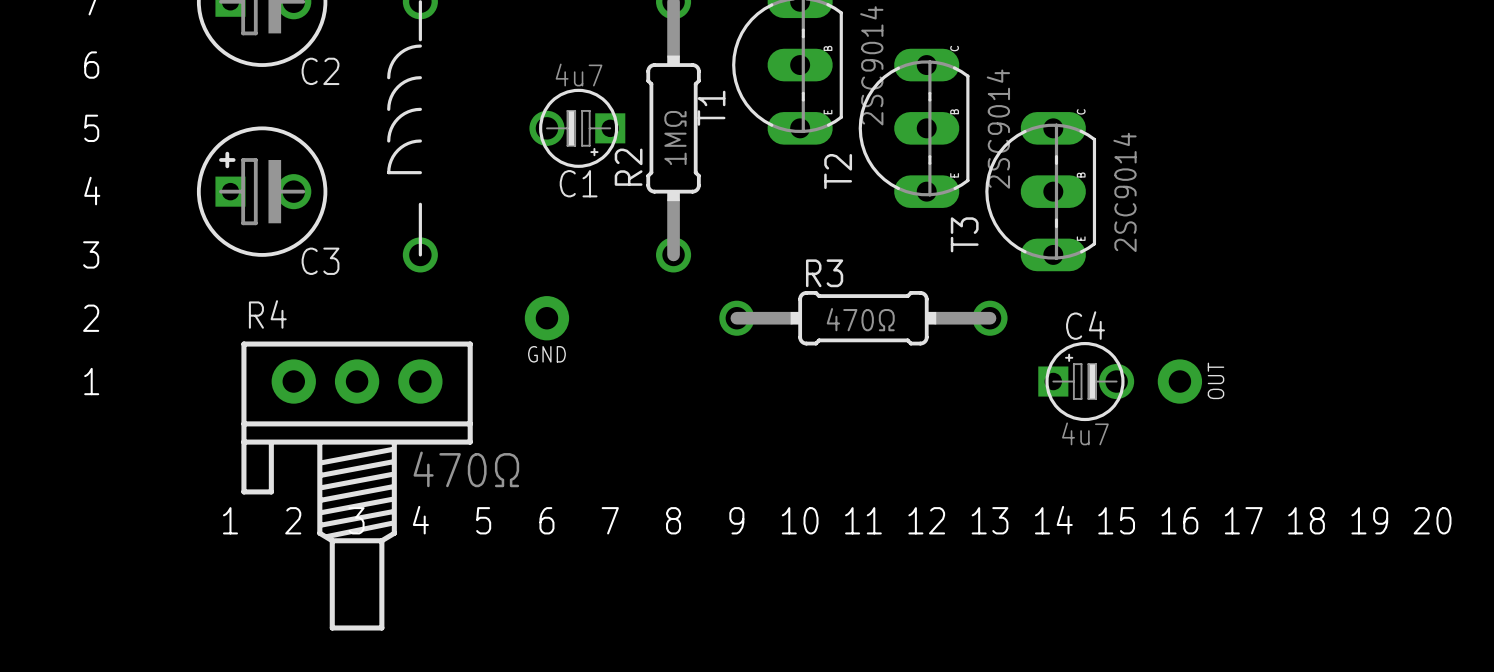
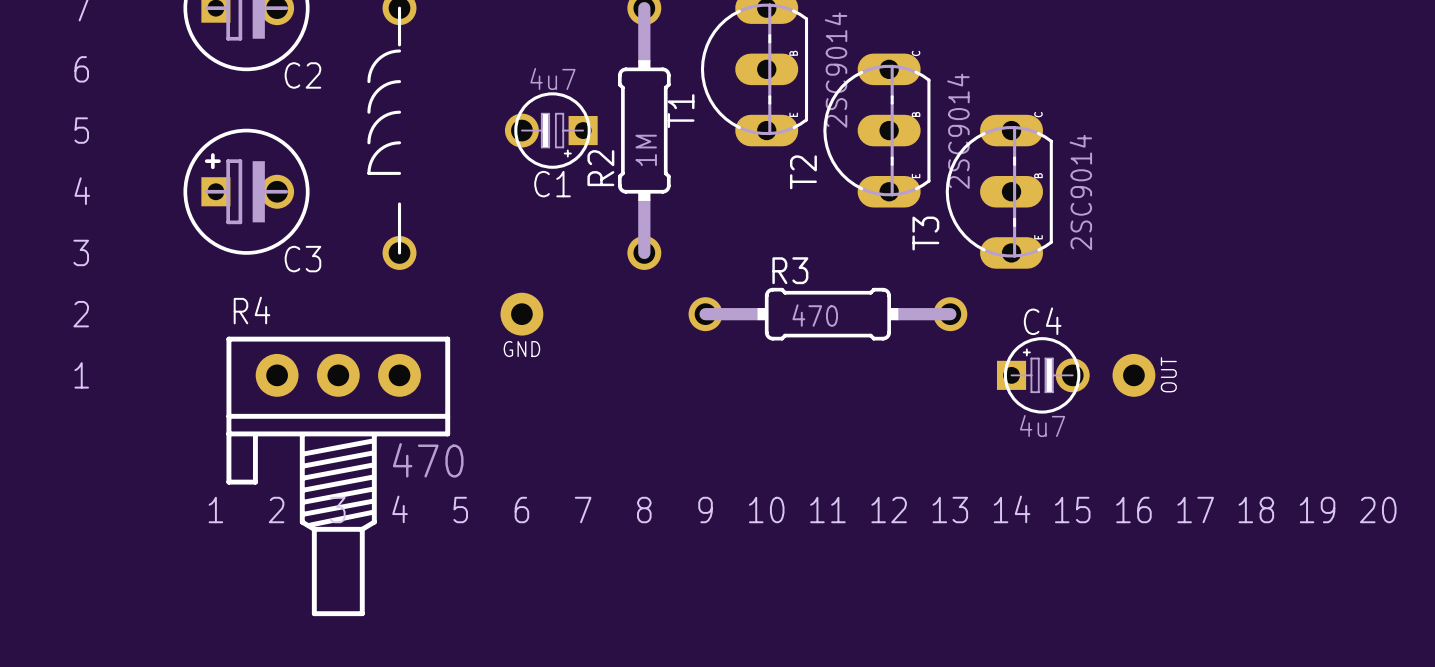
R2 value: 1MΩ (675, 138) -> 1M (646, 150)
R3 value: 470Ω (860, 319) -> 470 (815, 315)
R4 value: 470Ω (466, 469) -> 470 (428, 460)

